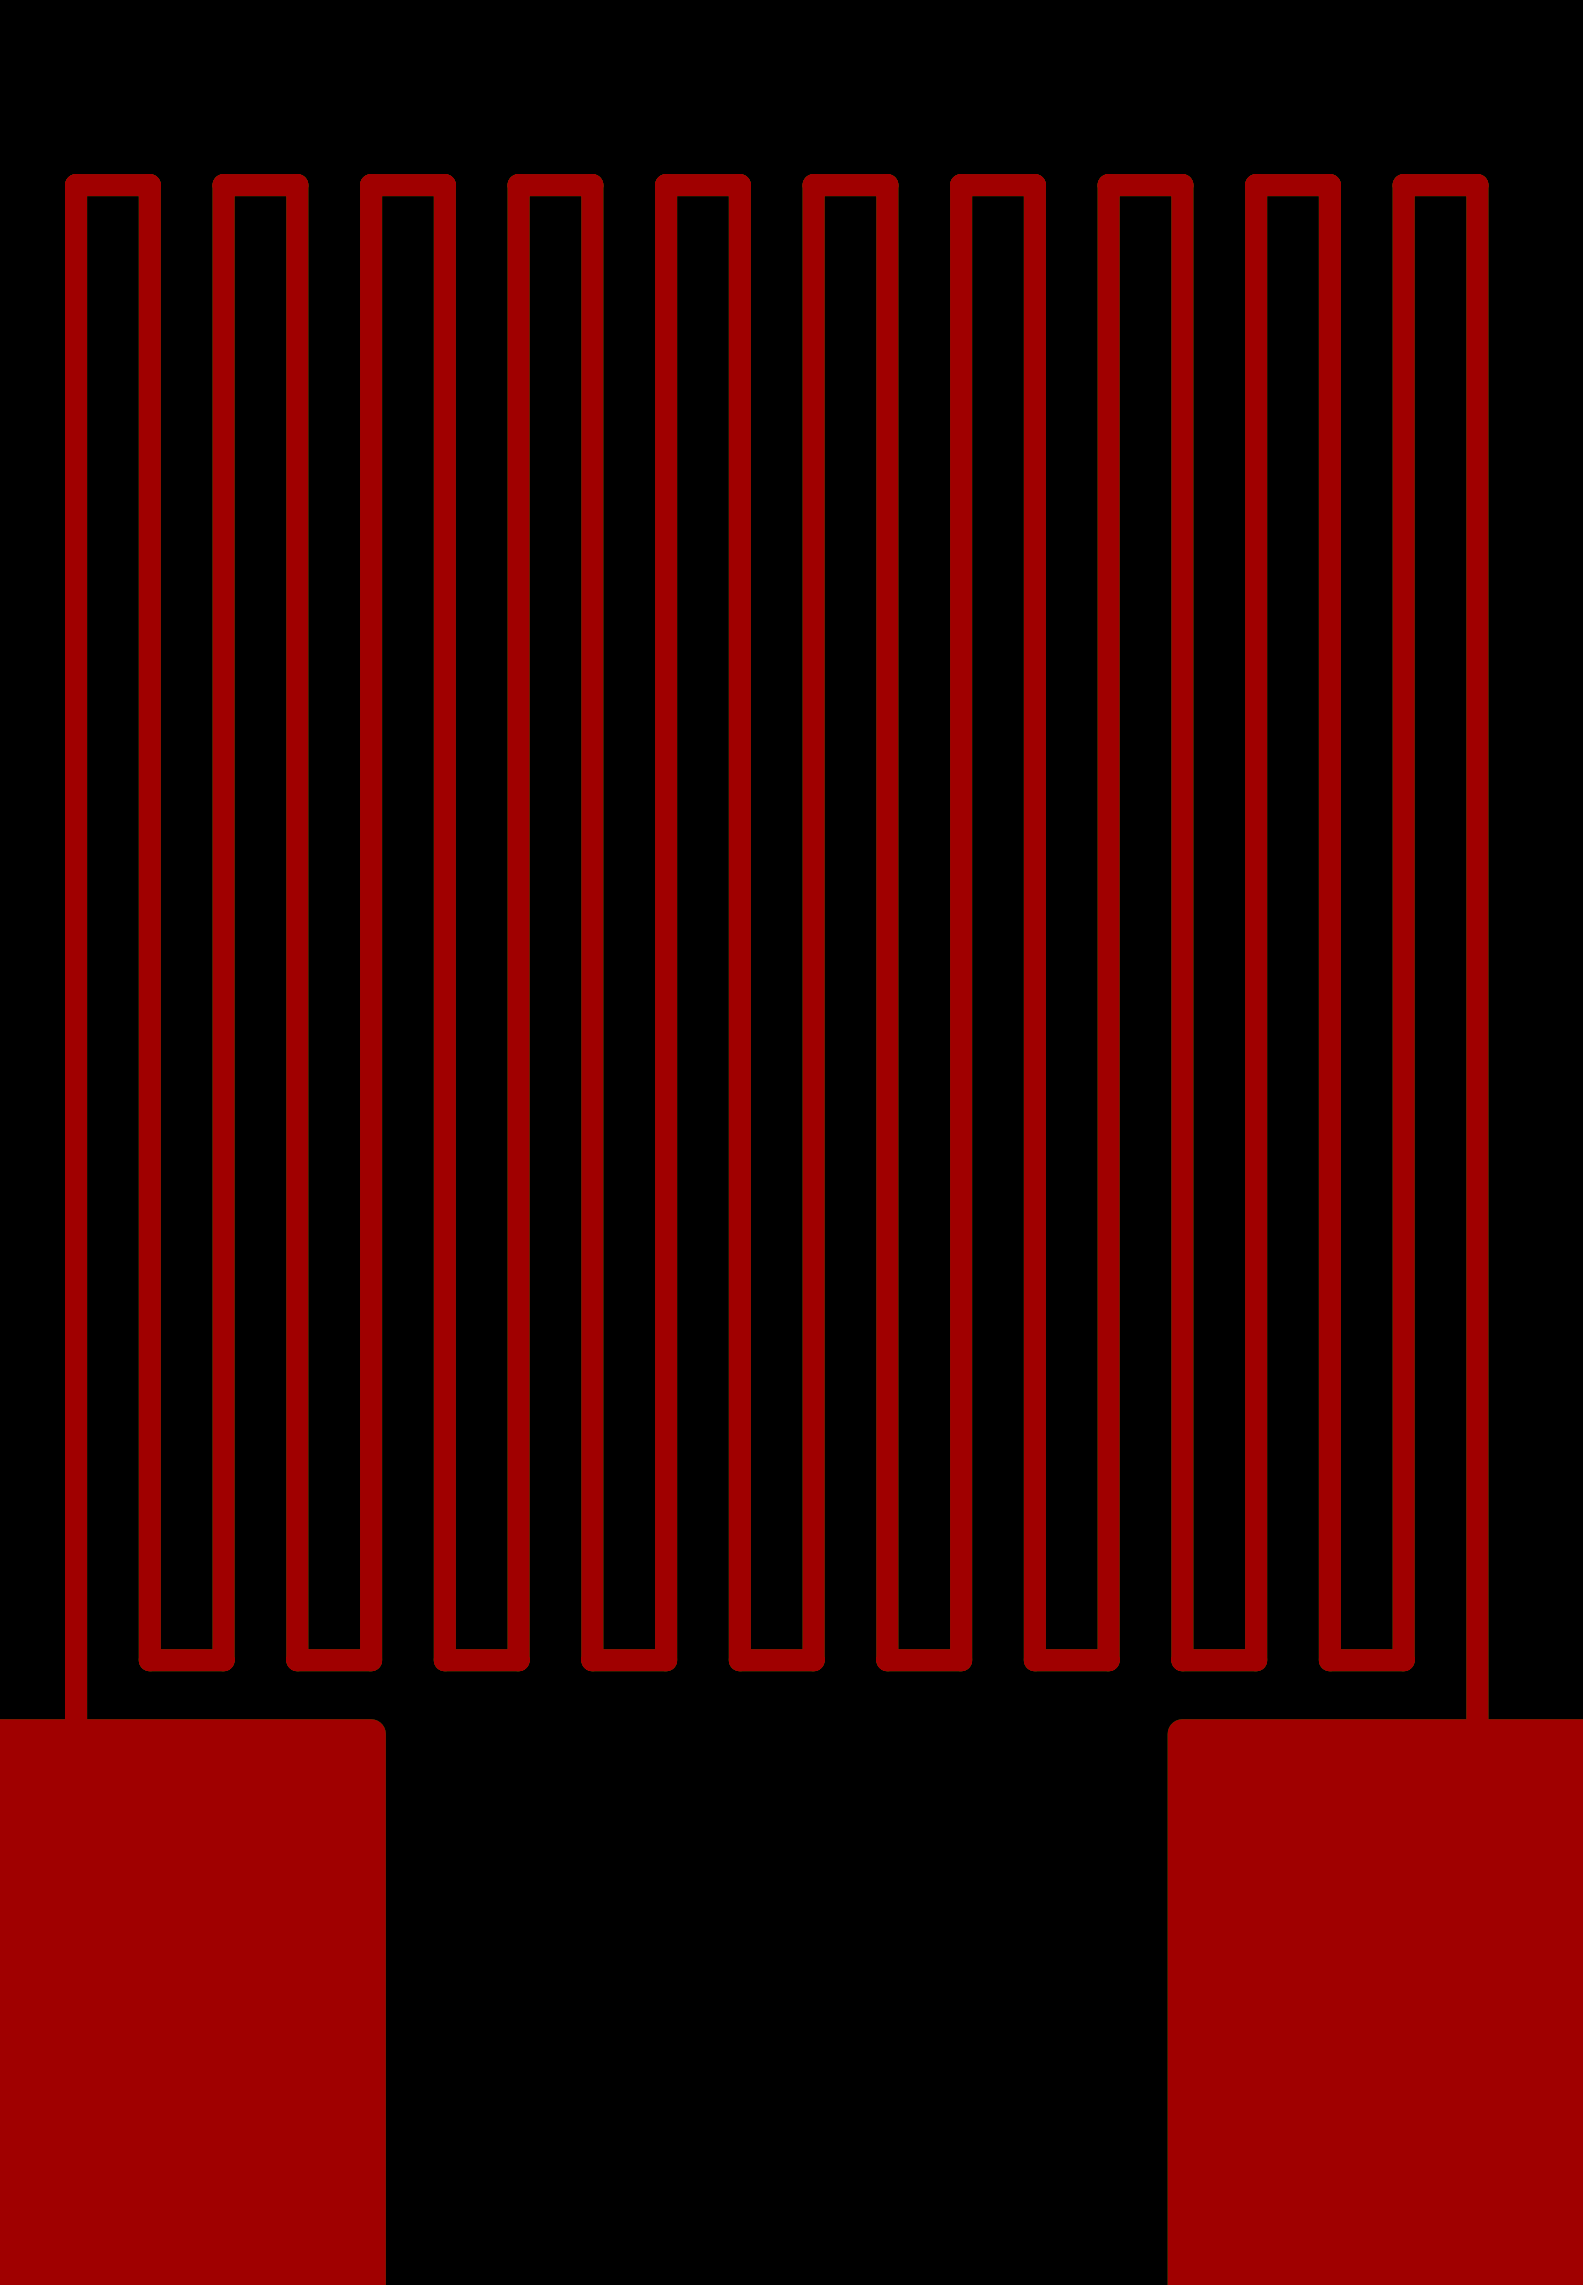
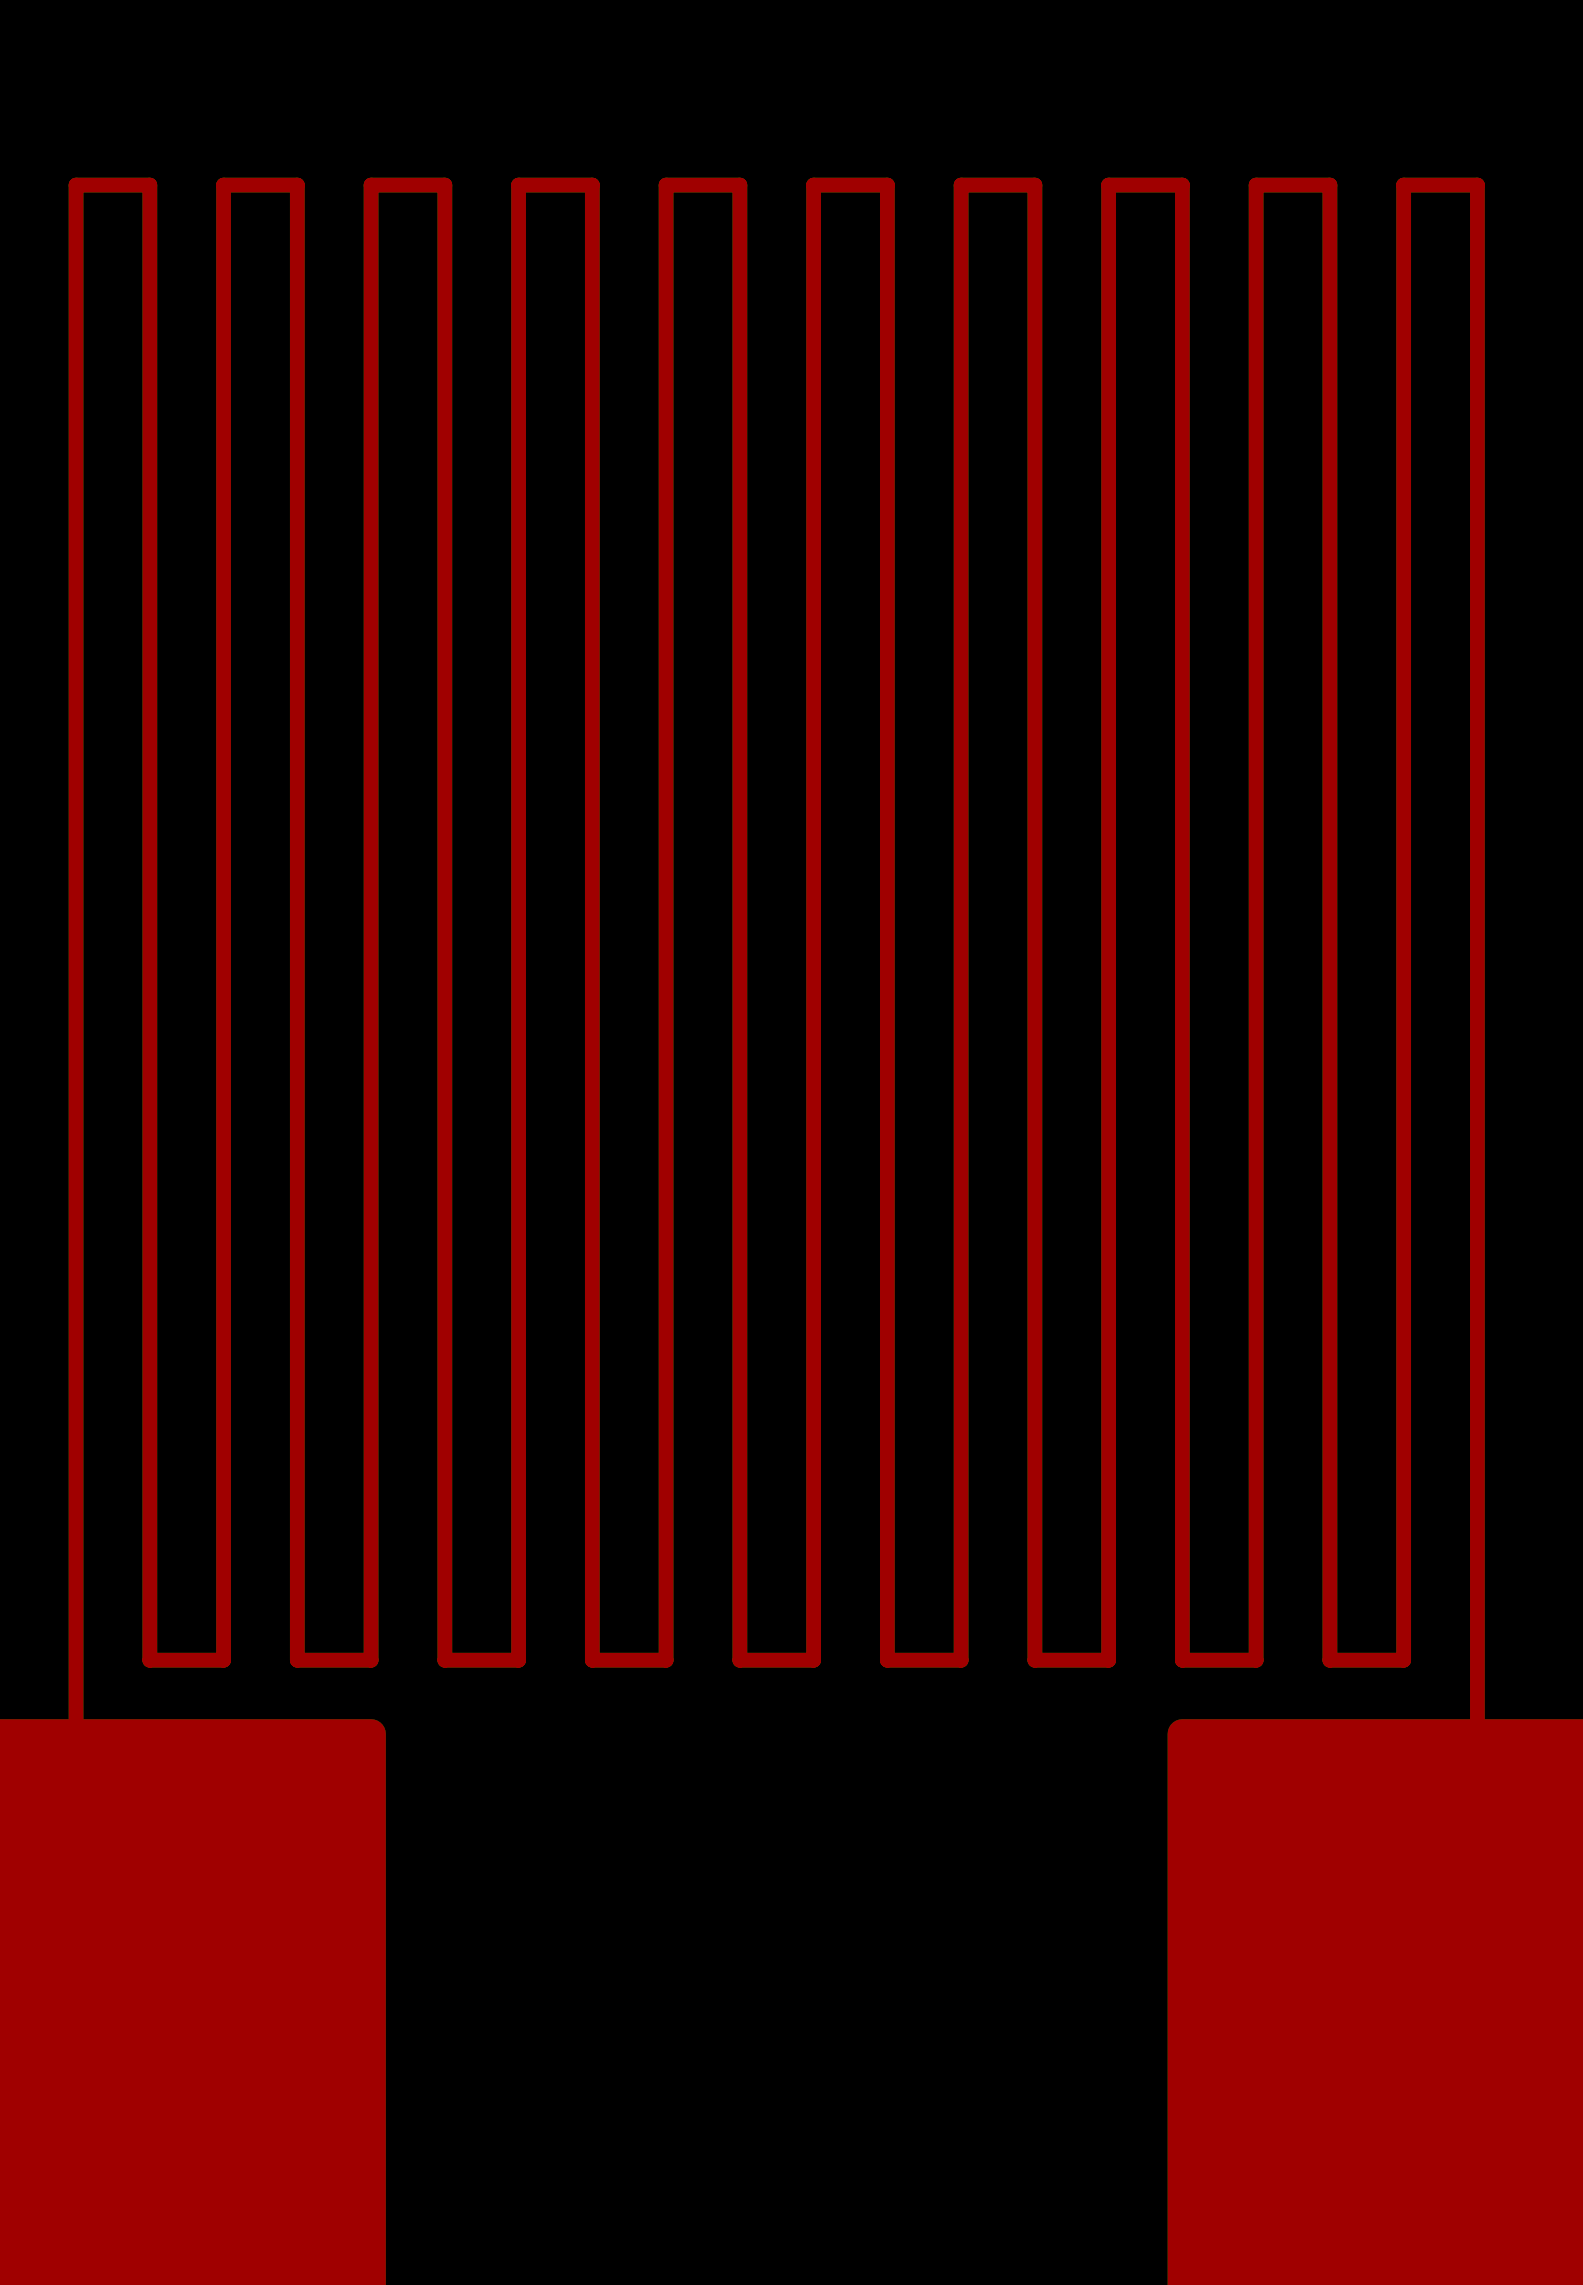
top track width: thick (76, 2028) (76, 185) (149, 185) (149, 1660) (223, 1660) (223, 185) (297, 185) (297, 1660) (371, 1660) (371, 185) (444, 185) (444, 1660) (518, 1660) (518, 185) (592, 185) (592, 1660) (666, 1660) (666, 185) (739, 185) (739, 1660) (813, 1660) (813, 185) (887, 185) (887, 1660) (961, 1660) (961, 185) (1034, 185) (1034, 1660) (1108, 1660) (1108, 185) (1182, 185) (1182, 1660) (1256, 1660) (1256, 185) (1329, 185) (1329, 1660) (1403, 1660) (1403, 185) (1477, 185) (1477, 2028) -> thin (76, 2028) (76, 185) (149, 185) (149, 1660) (223, 1660) (223, 185) (297, 185) (297, 1660) (371, 1660) (371, 185) (444, 185) (444, 1660) (518, 1660) (518, 185) (592, 185) (592, 1660) (666, 1660) (666, 185) (739, 185) (739, 1660) (813, 1660) (813, 185) (887, 185) (887, 1660) (961, 1660) (961, 185) (1034, 185) (1034, 1660) (1108, 1660) (1108, 185) (1182, 185) (1182, 1660) (1256, 1660) (1256, 185) (1329, 185) (1329, 1660) (1403, 1660) (1403, 185) (1477, 185) (1477, 2028)

